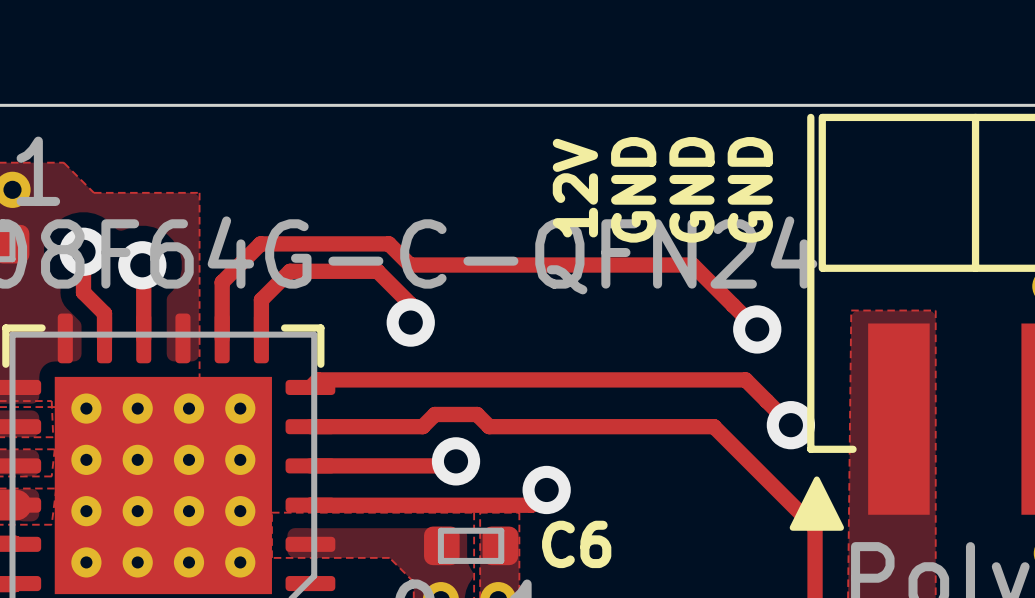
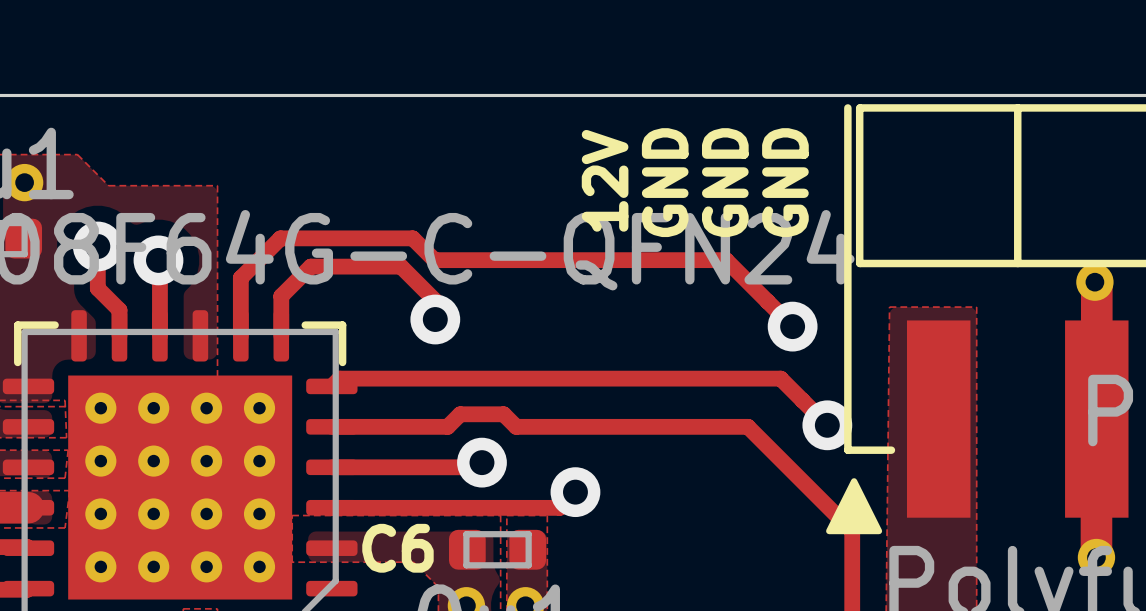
C6 name position: C6 (576, 544) -> C6 (397, 548)

